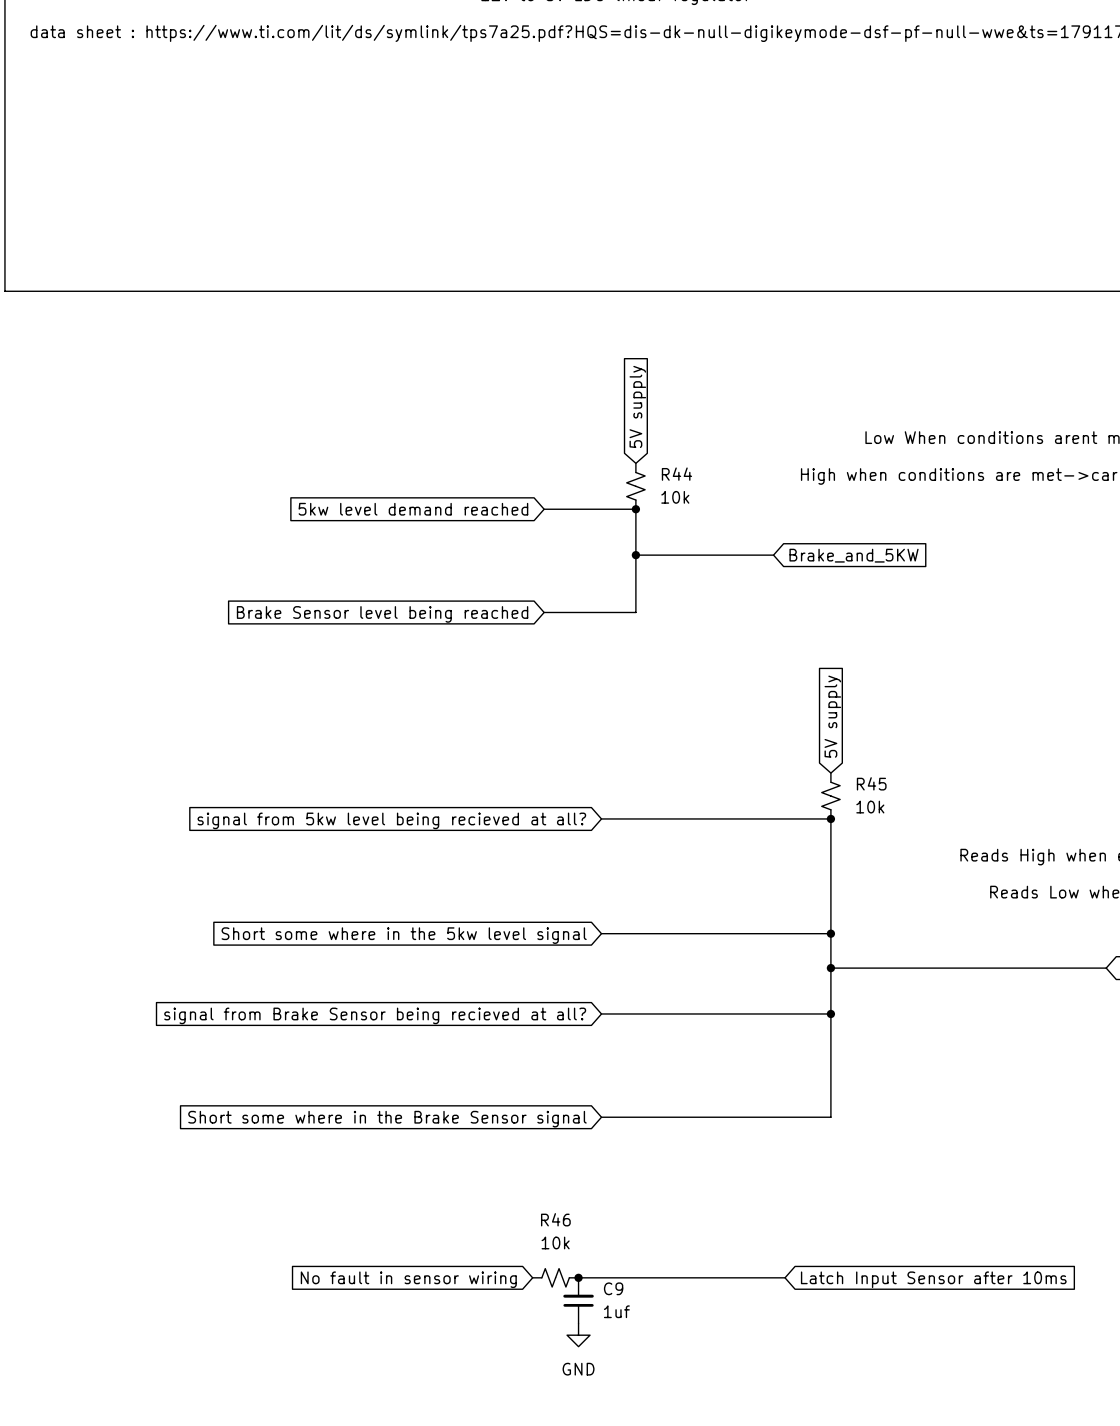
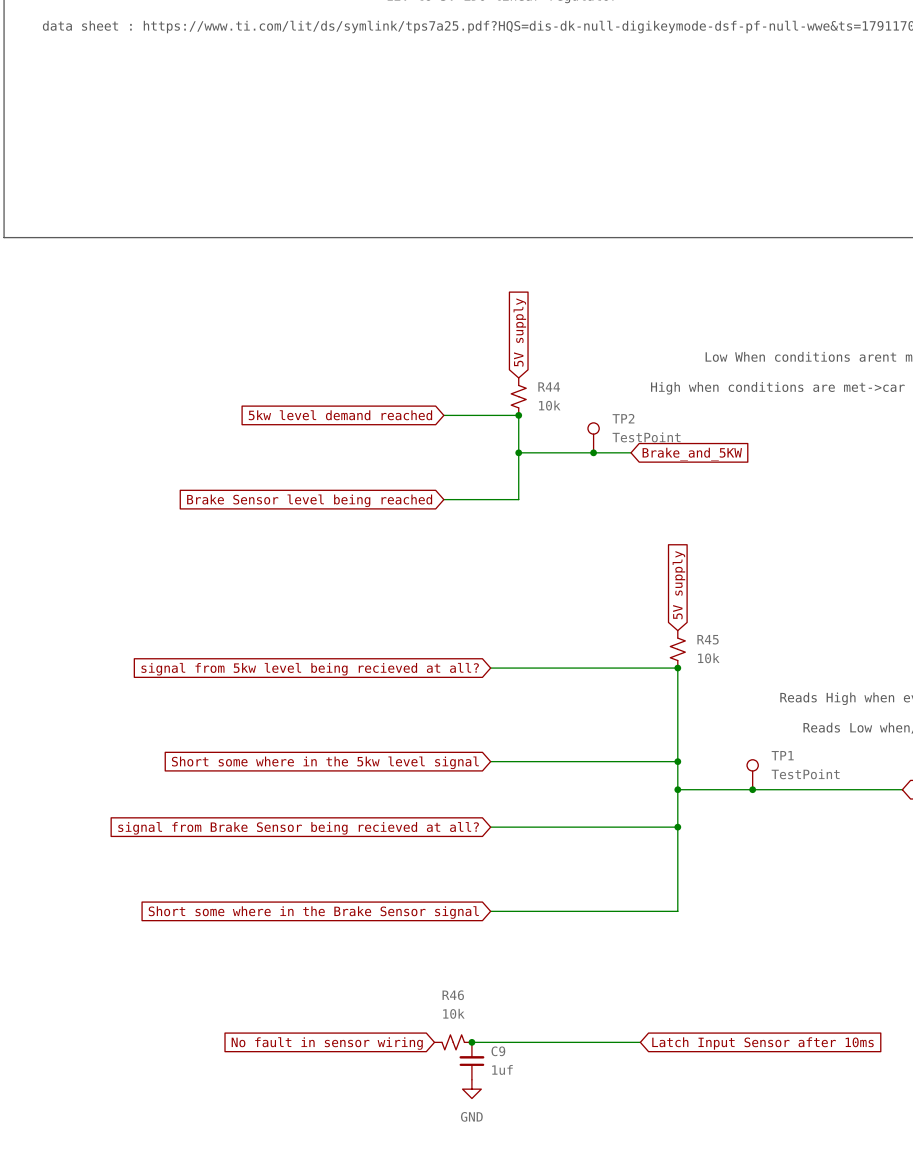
TP2: none -> TestPoint (593, 437)
junction: none -> (593, 452)
TP1: none -> TestPoint (752, 774)
junction: none -> (752, 789)
R46 flip: as is (555, 1277) -> left-right (453, 1042)

